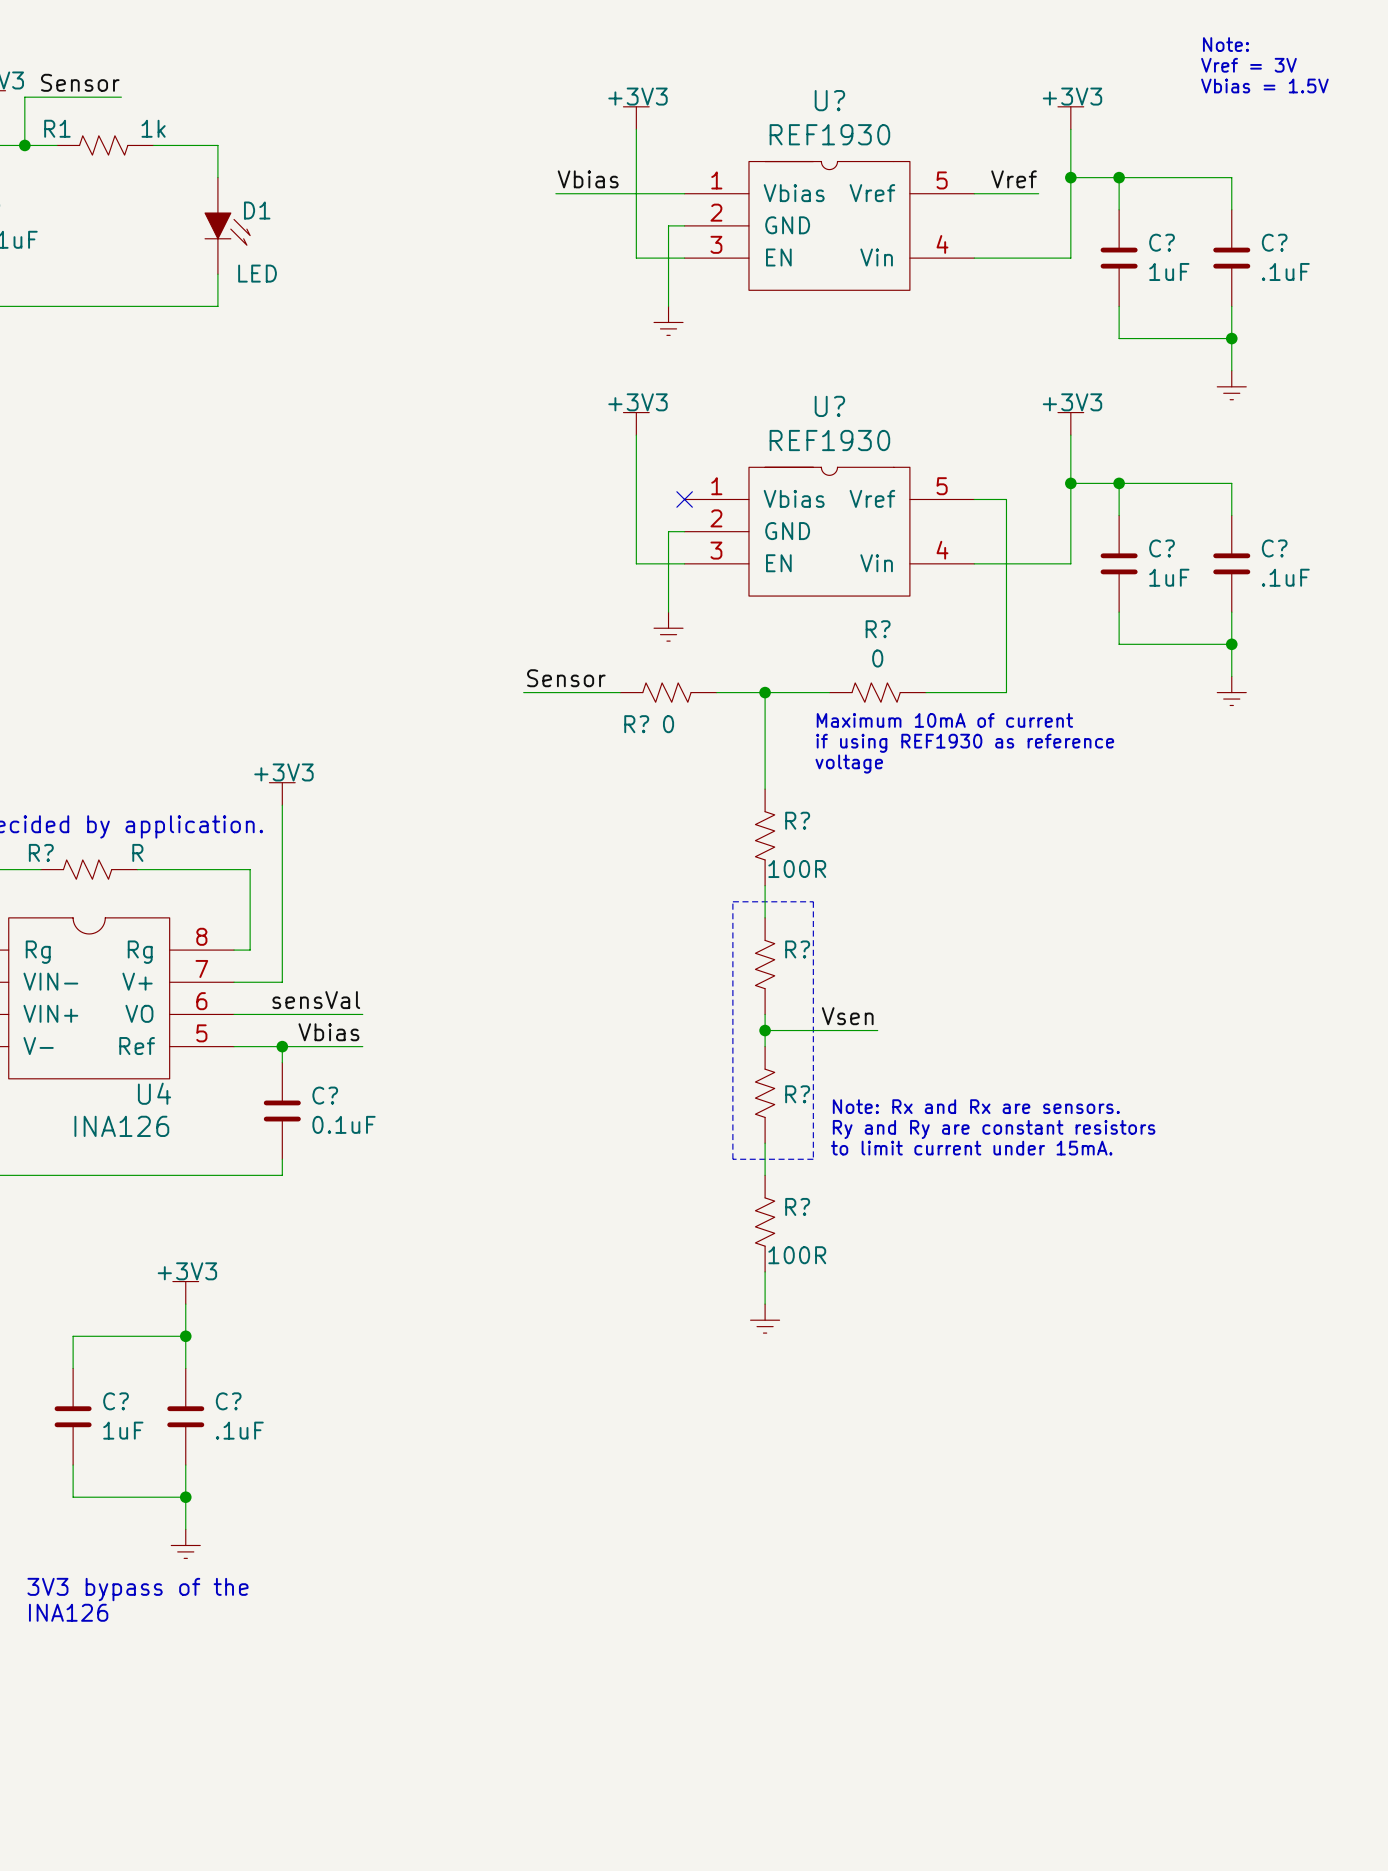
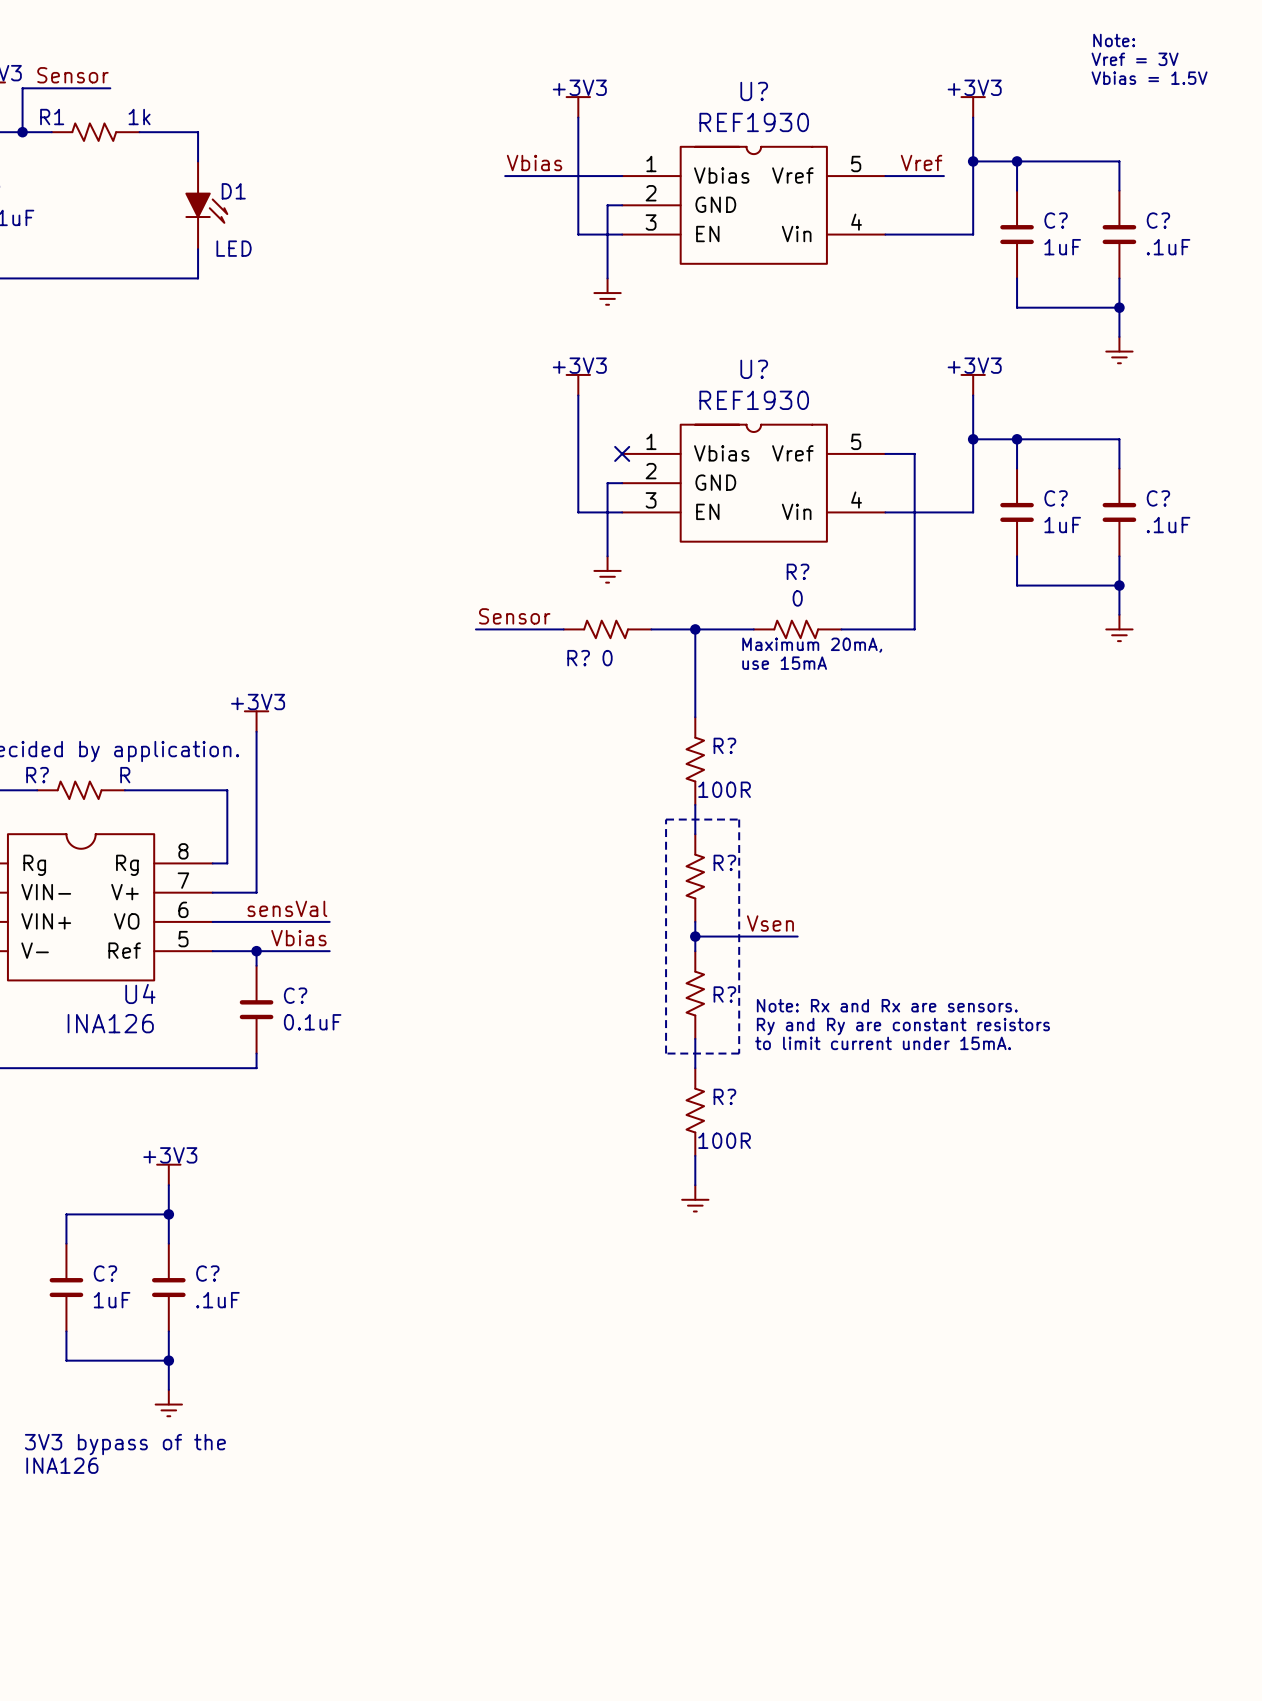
text: Maximum 10mA of current (944, 720) -> Maximum 20mA, (812, 645)
text: none -> use 15mA (784, 663)
text: if using REF1930 as reference (965, 743) -> none
text: voltage (849, 764) -> none

